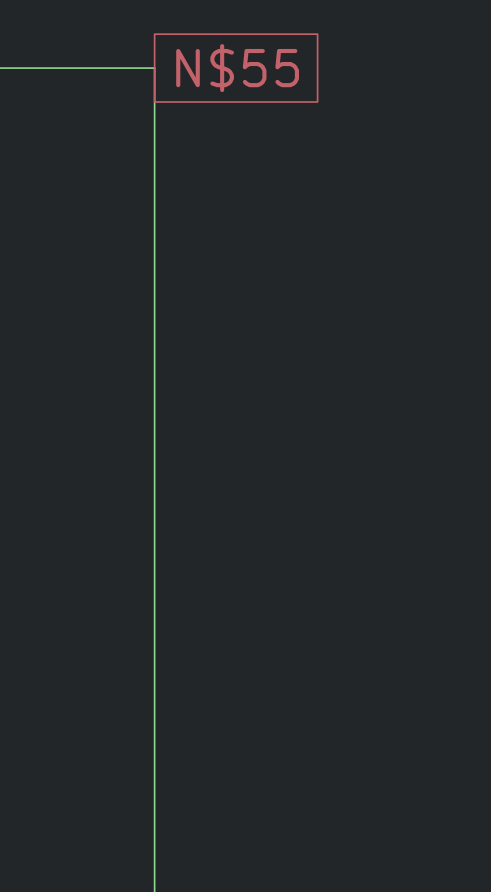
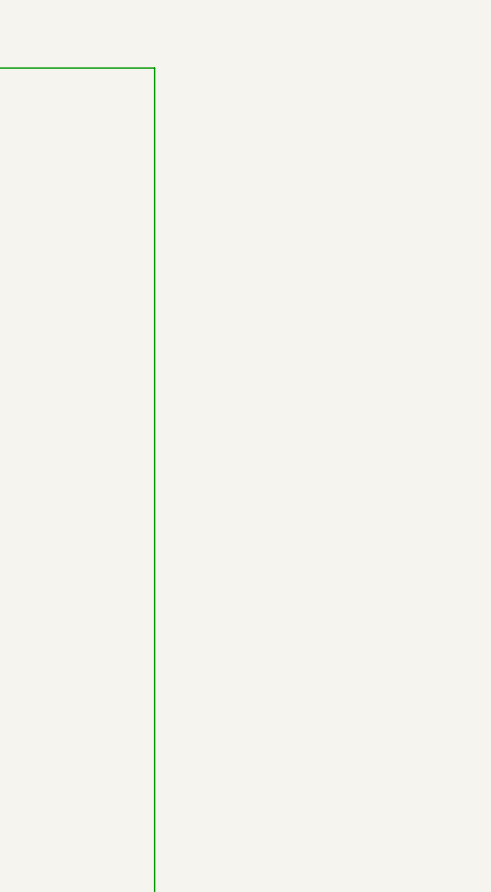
global label: N$55 (237, 68) -> none

